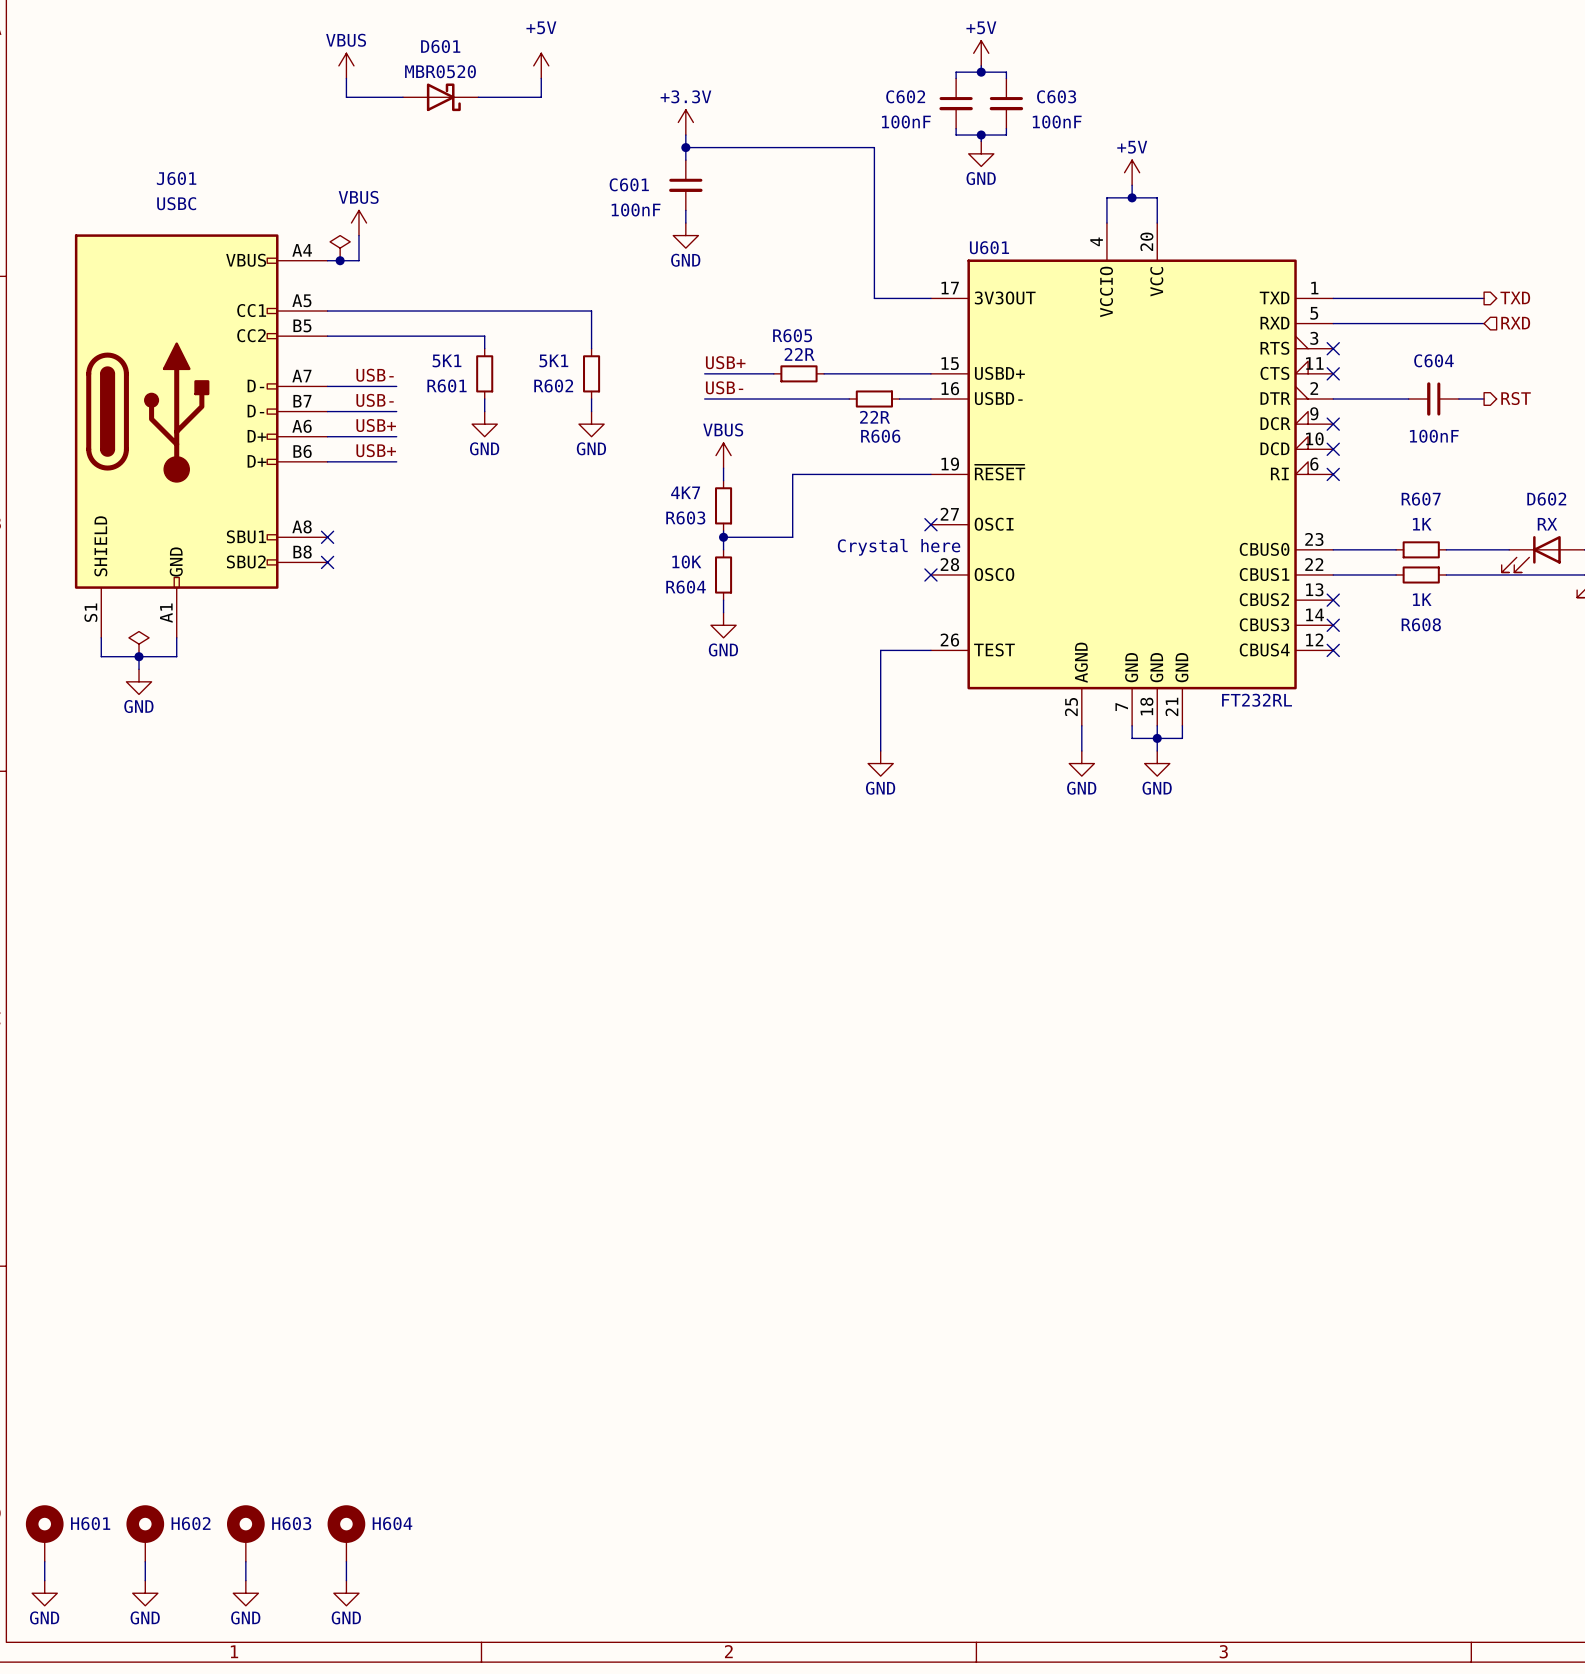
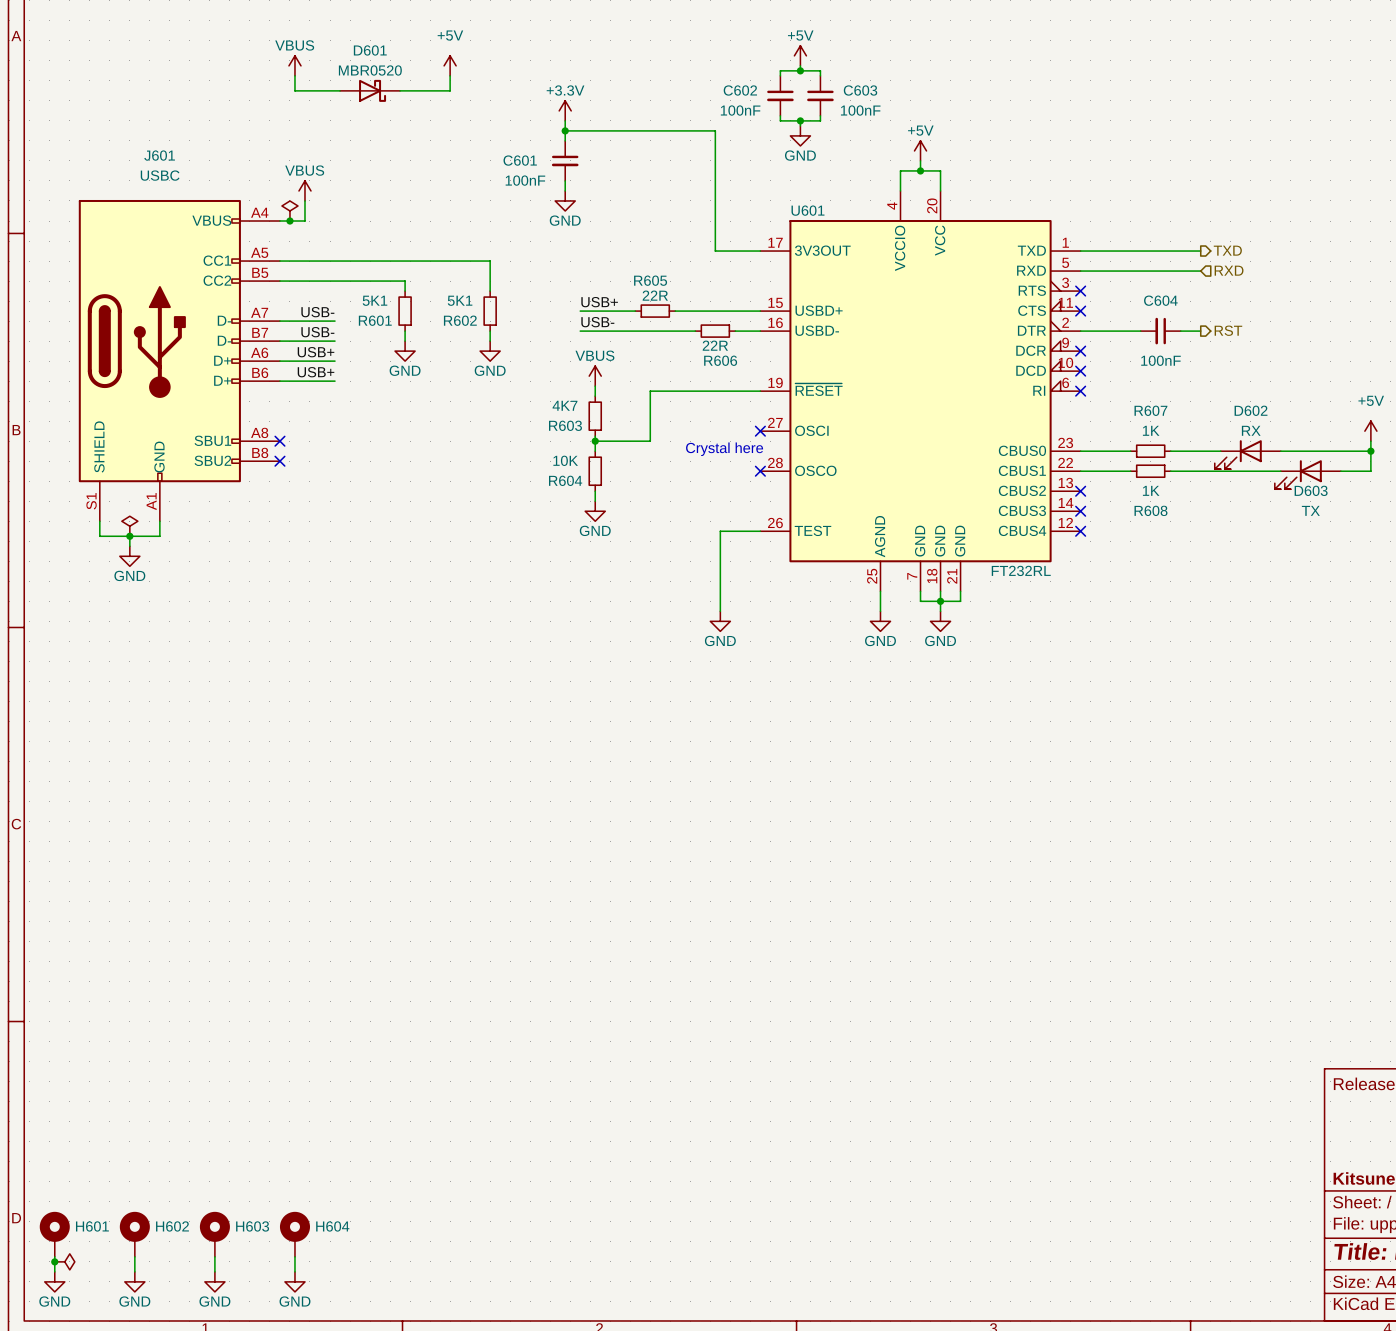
junction: none -> (54, 1261)
power symbol: none -> (64, 1261)

